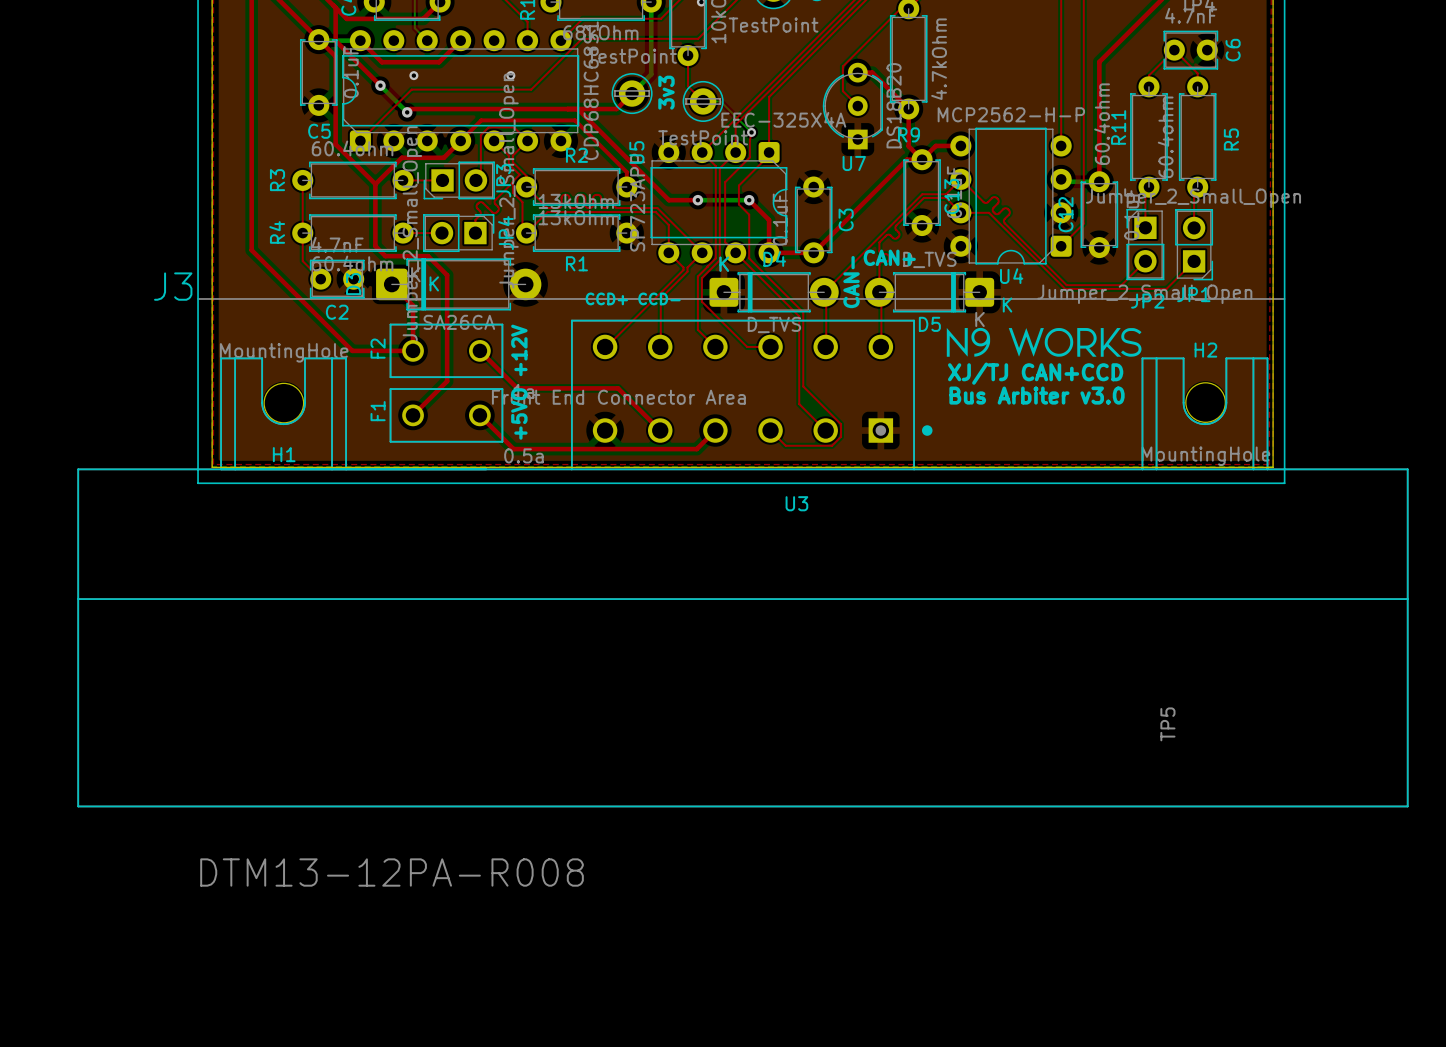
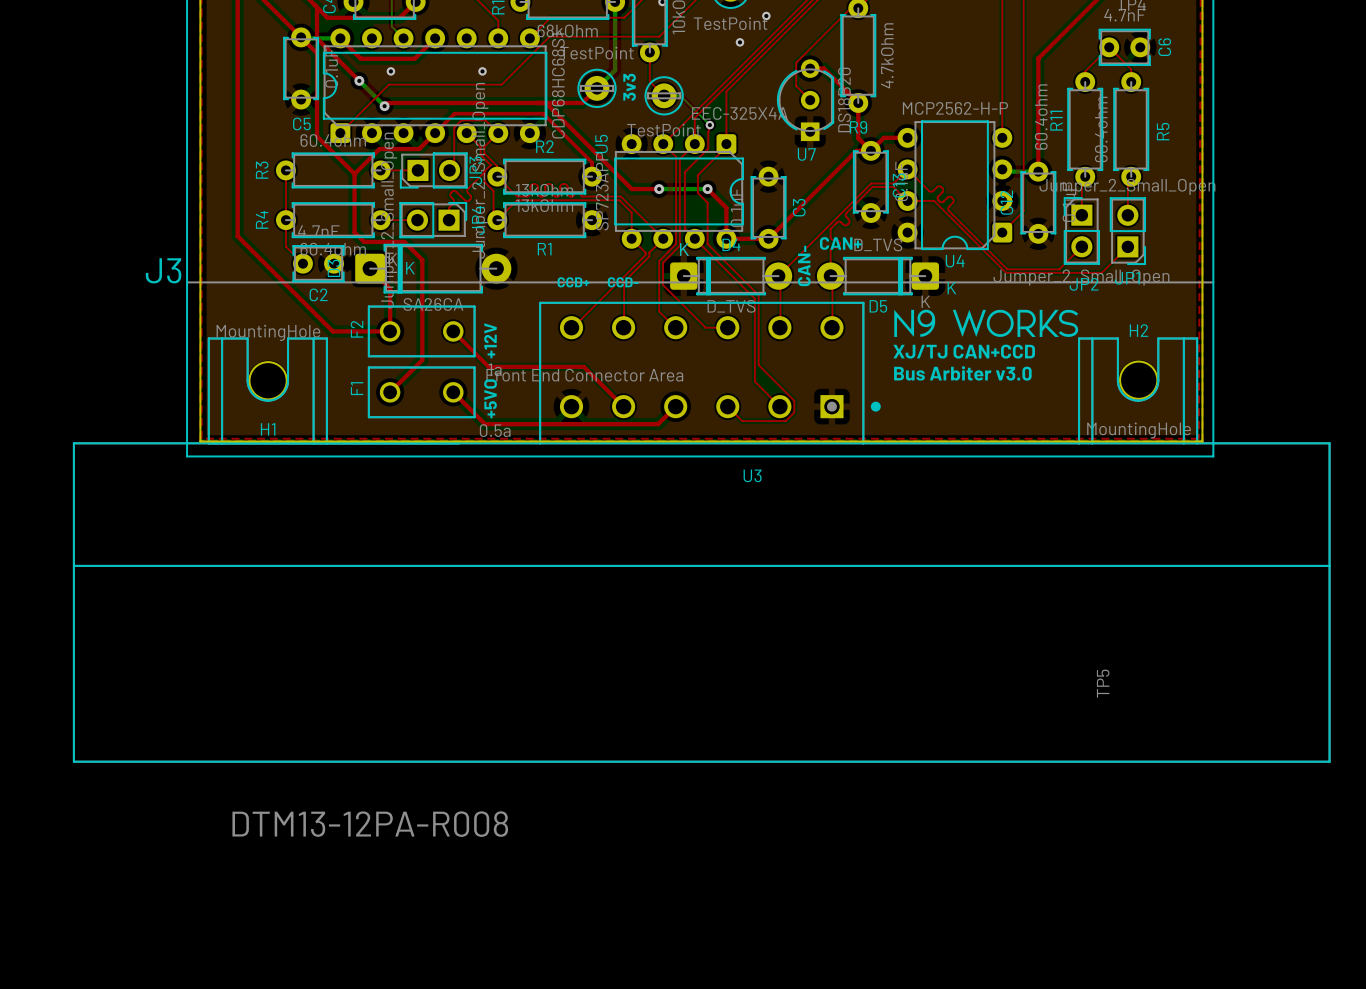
via: none -> (766, 15)
via: none -> (739, 42)

